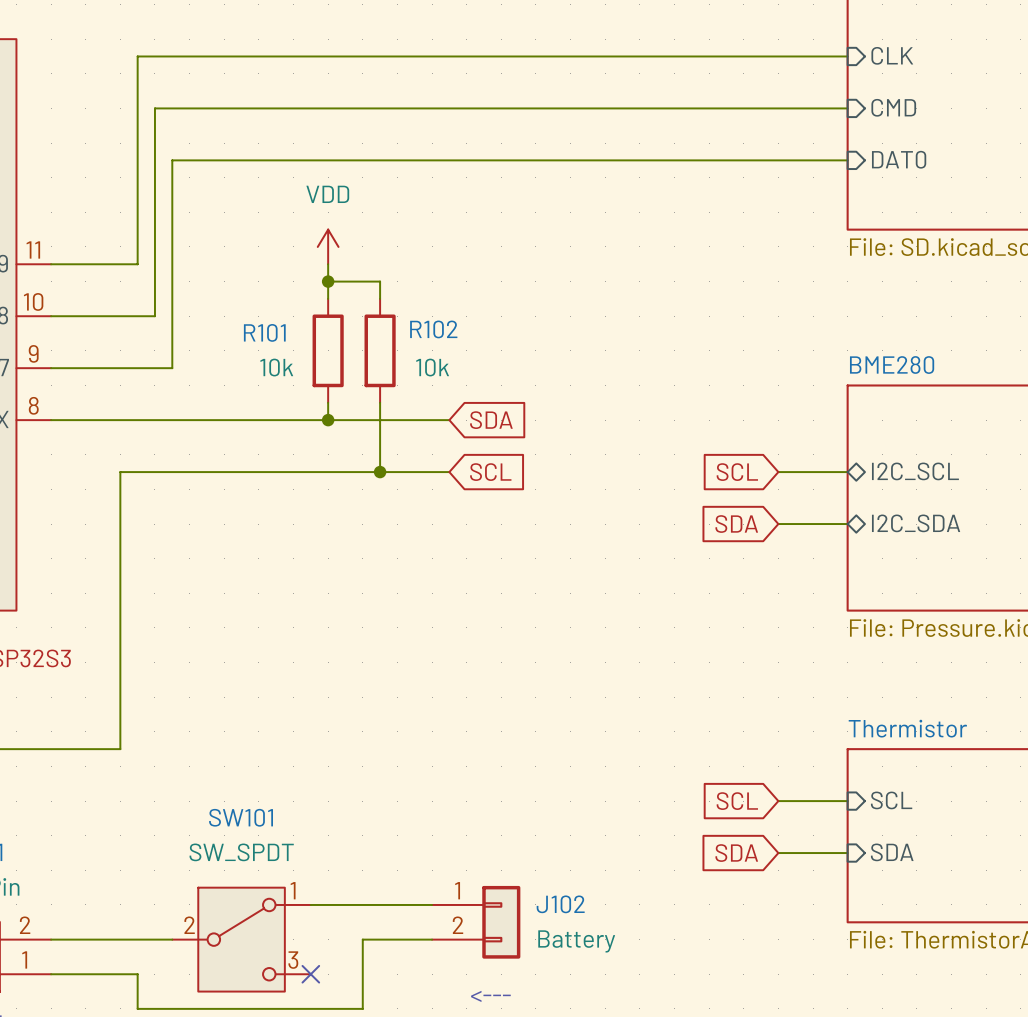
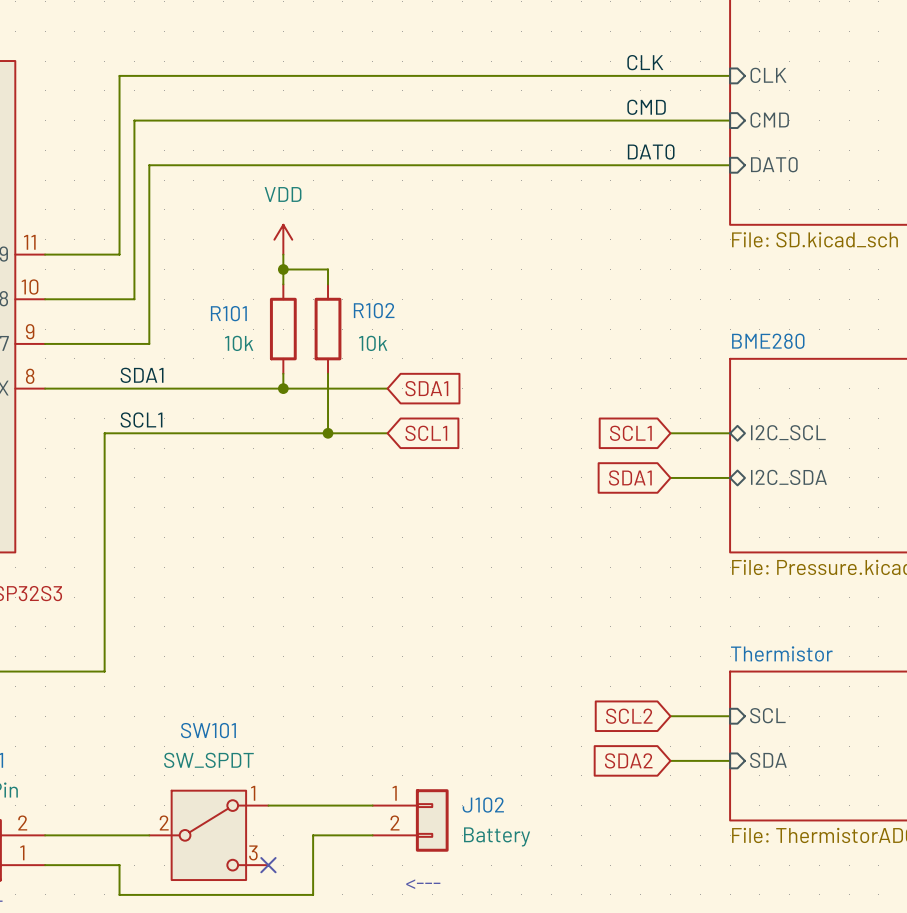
label: none -> CLK (645, 62)
label: none -> CMD (646, 107)
label: none -> DAT0 (651, 151)
label: none -> SDA1 (142, 375)
global label: SDA (491, 420) -> SDA1 (426, 388)
label: none -> SCL1 (141, 420)
global label: SCL (490, 472) -> SCL1 (426, 433)
global label: SCL (737, 472) -> SCL1 (630, 433)
global label: SDA (736, 524) -> SDA1 (630, 477)
global label: SCL (737, 801) -> SCL2 (629, 716)
global label: SDA (736, 853) -> SDA2 (628, 760)

